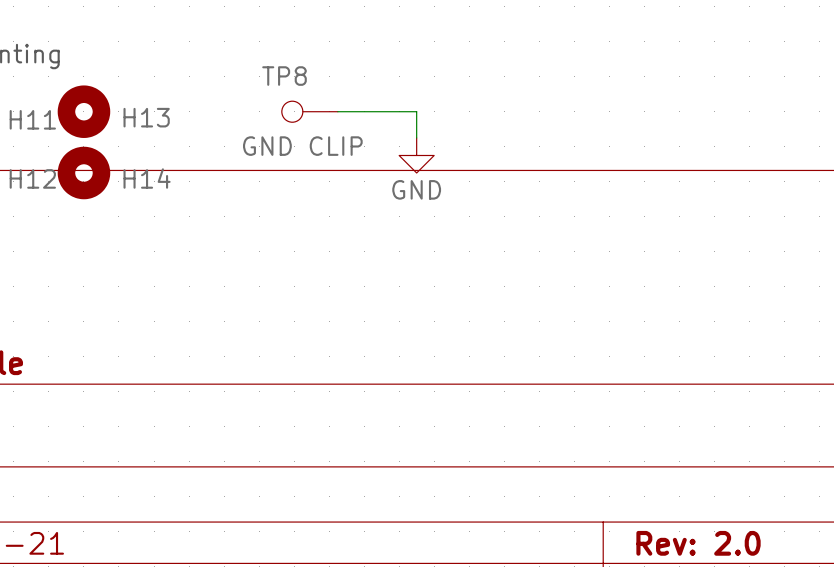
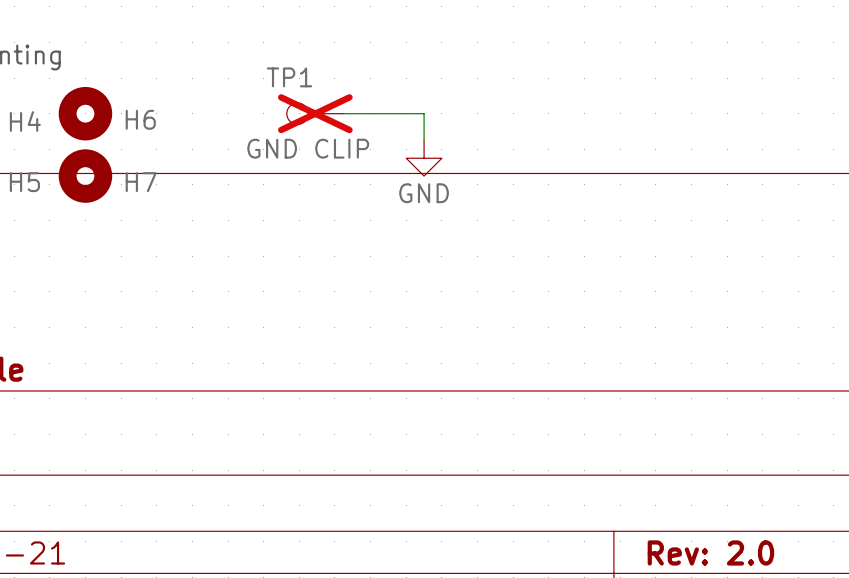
TP8 name: TP8 (284, 76) -> TP1 (289, 77)
TP8 do-not-place cross: none -> (315, 113)
H13 name: H13 (146, 117) -> H6 (140, 119)
H11 name: H11 (32, 119) -> H4 (25, 121)
H12 name: H12 (32, 178) -> H5 (24, 182)
H14 name: H14 (147, 178) -> H7 (141, 182)

